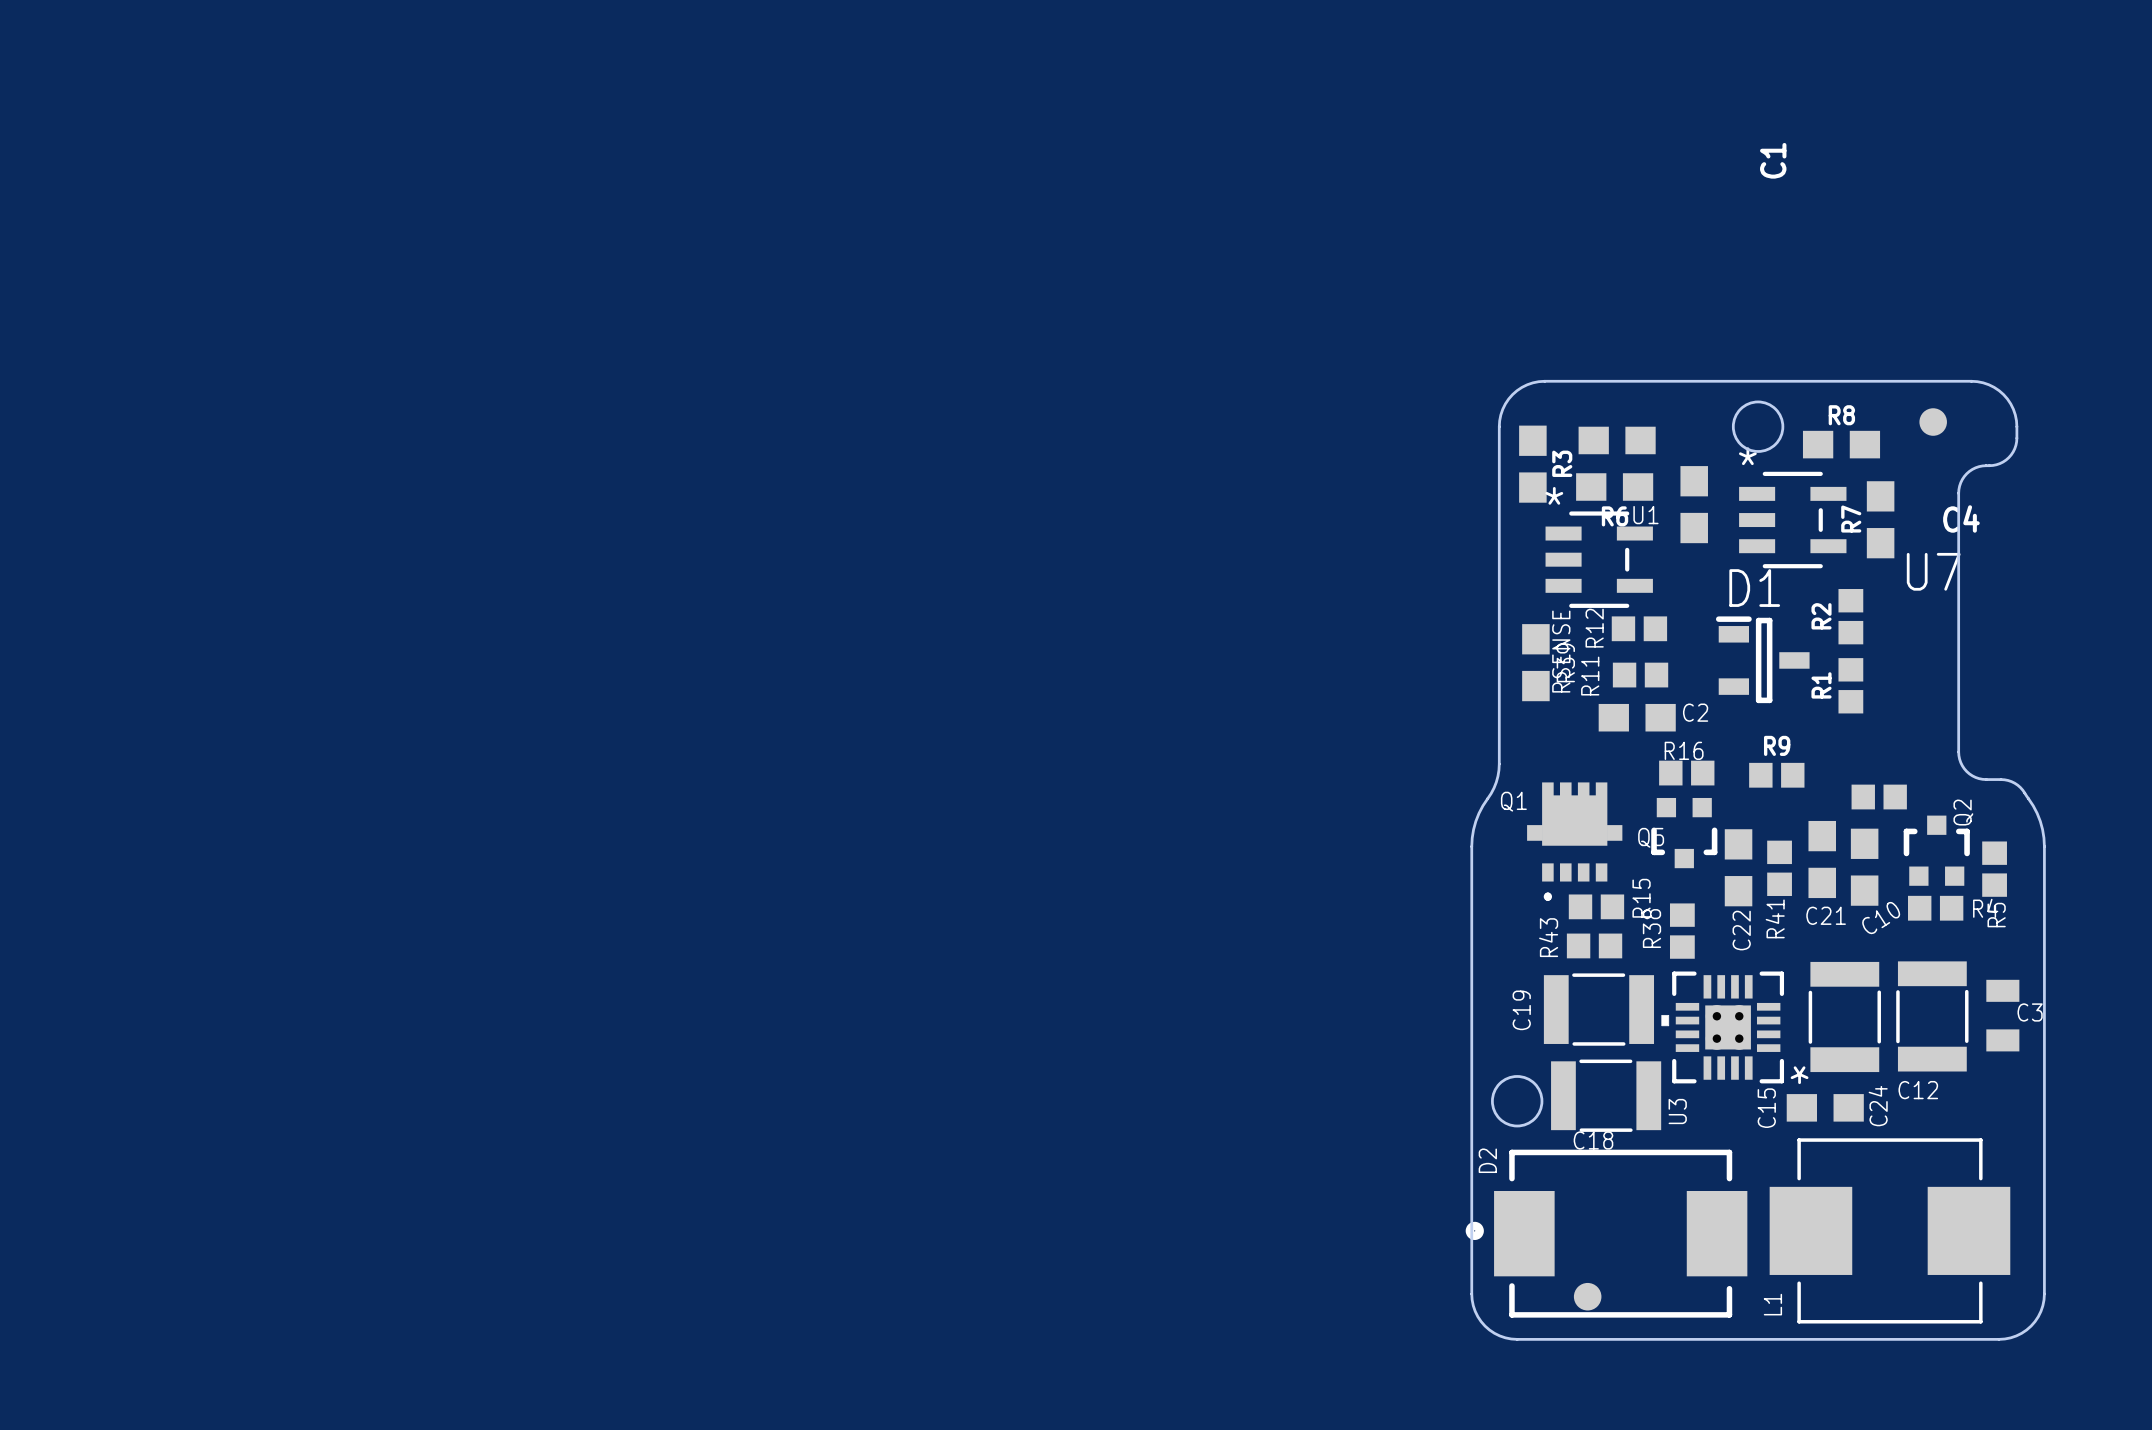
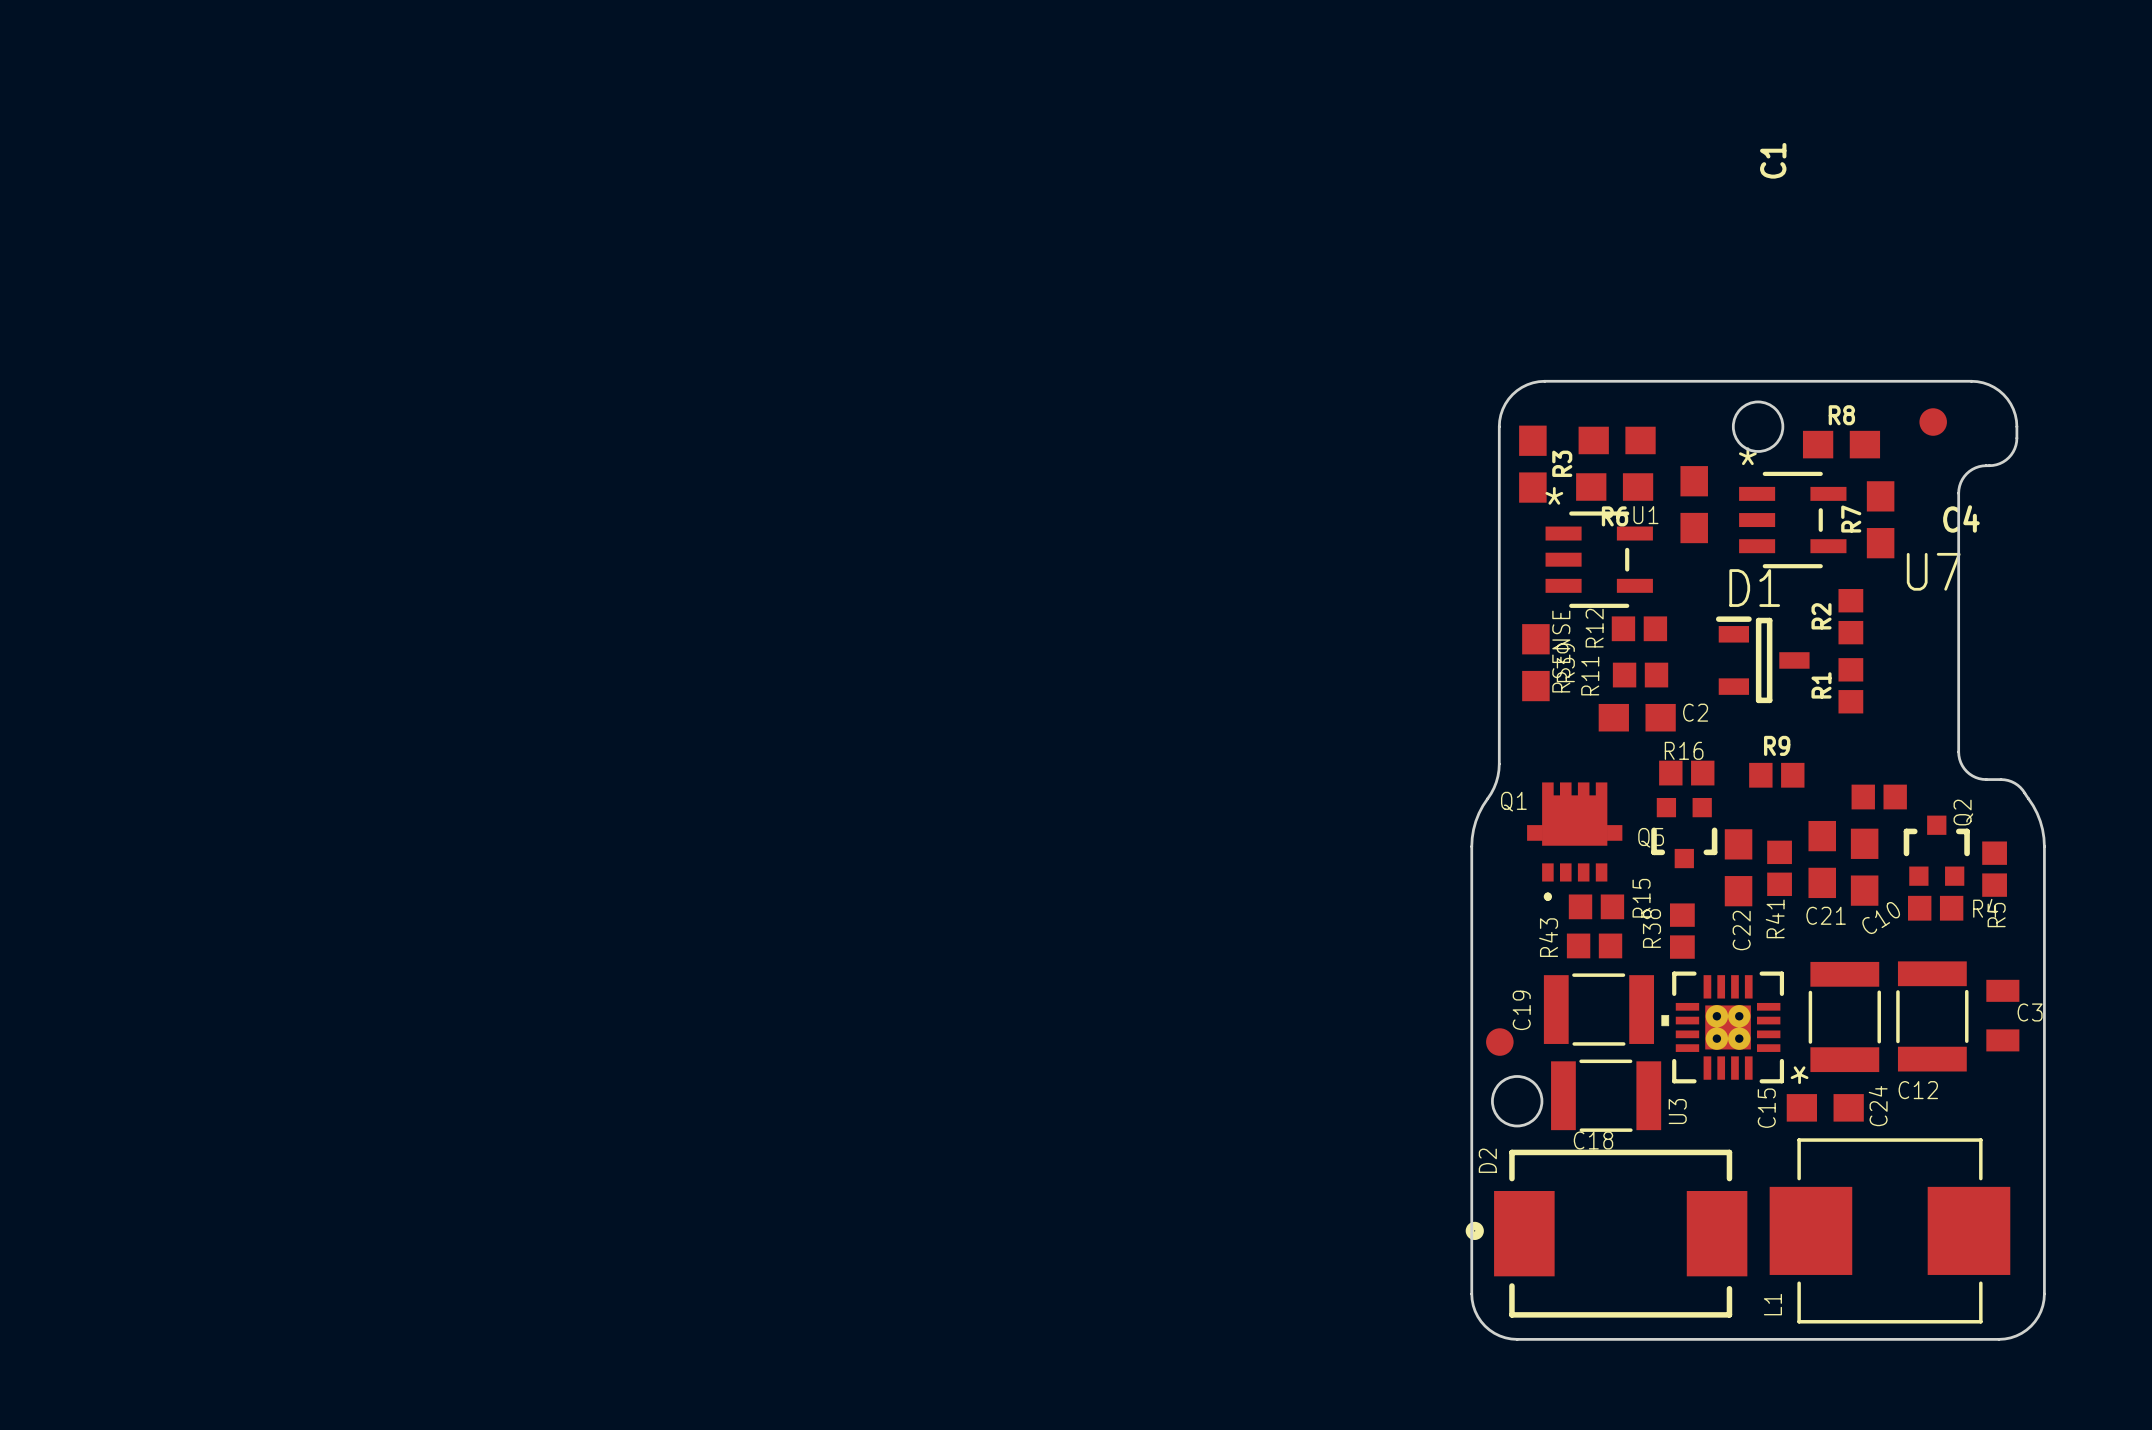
part position: (1587, 1296) -> (1499, 1042)

